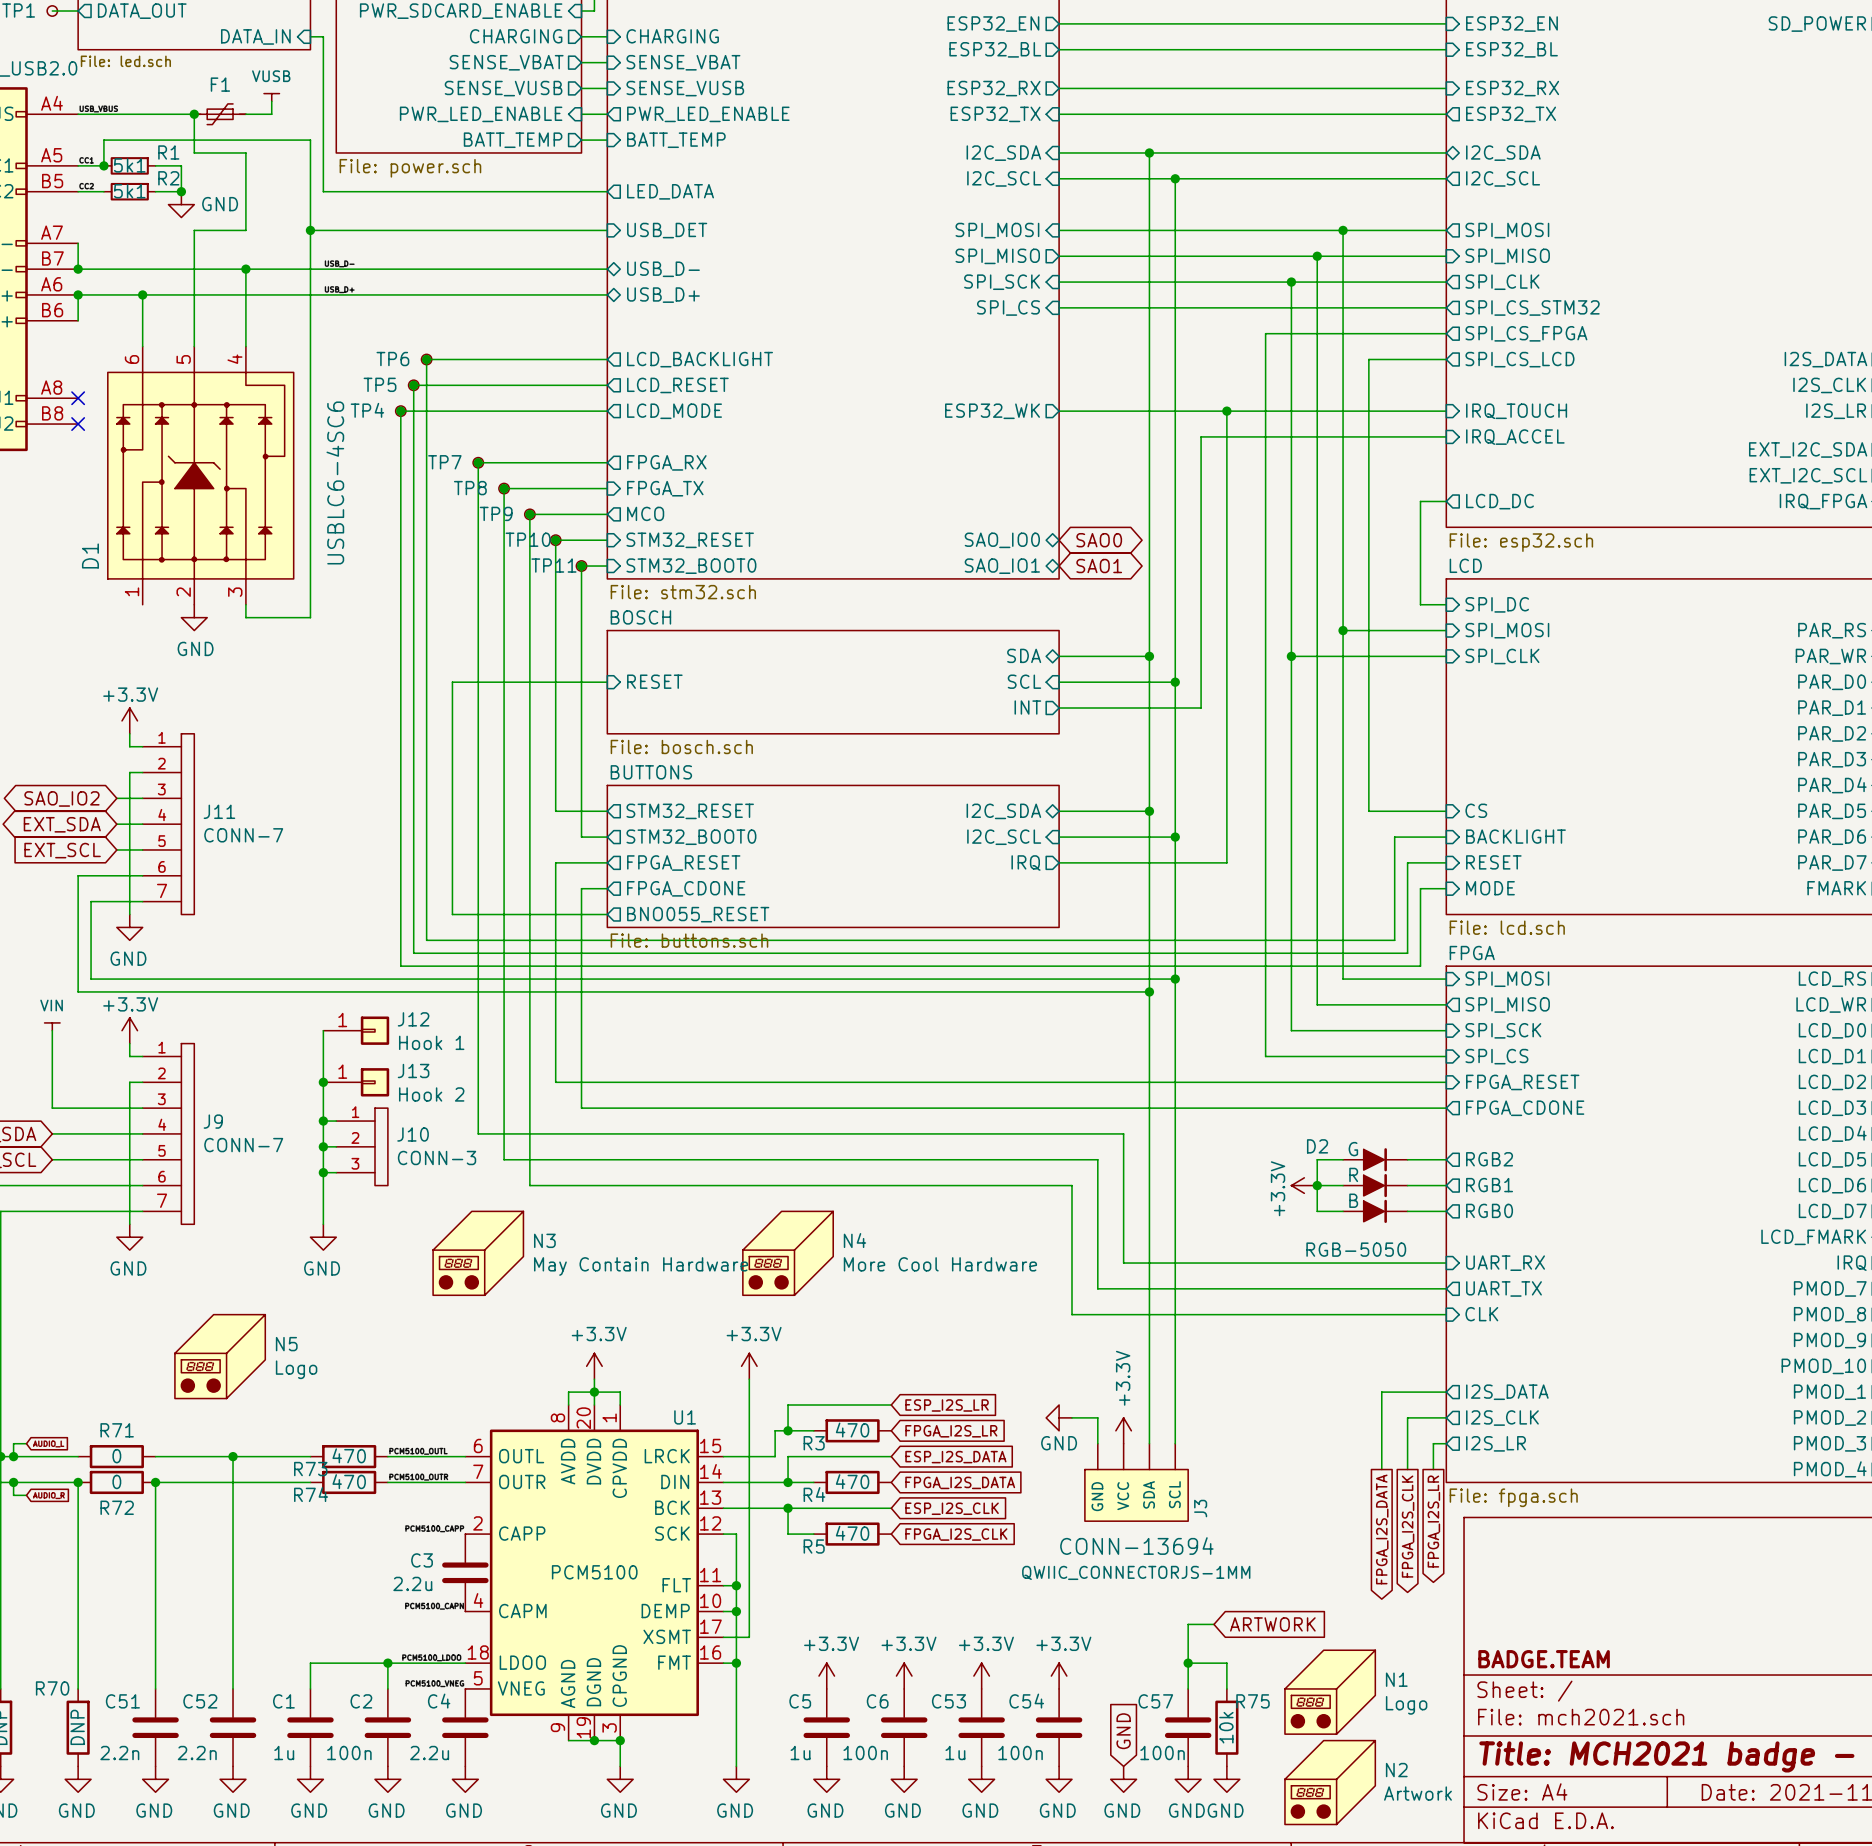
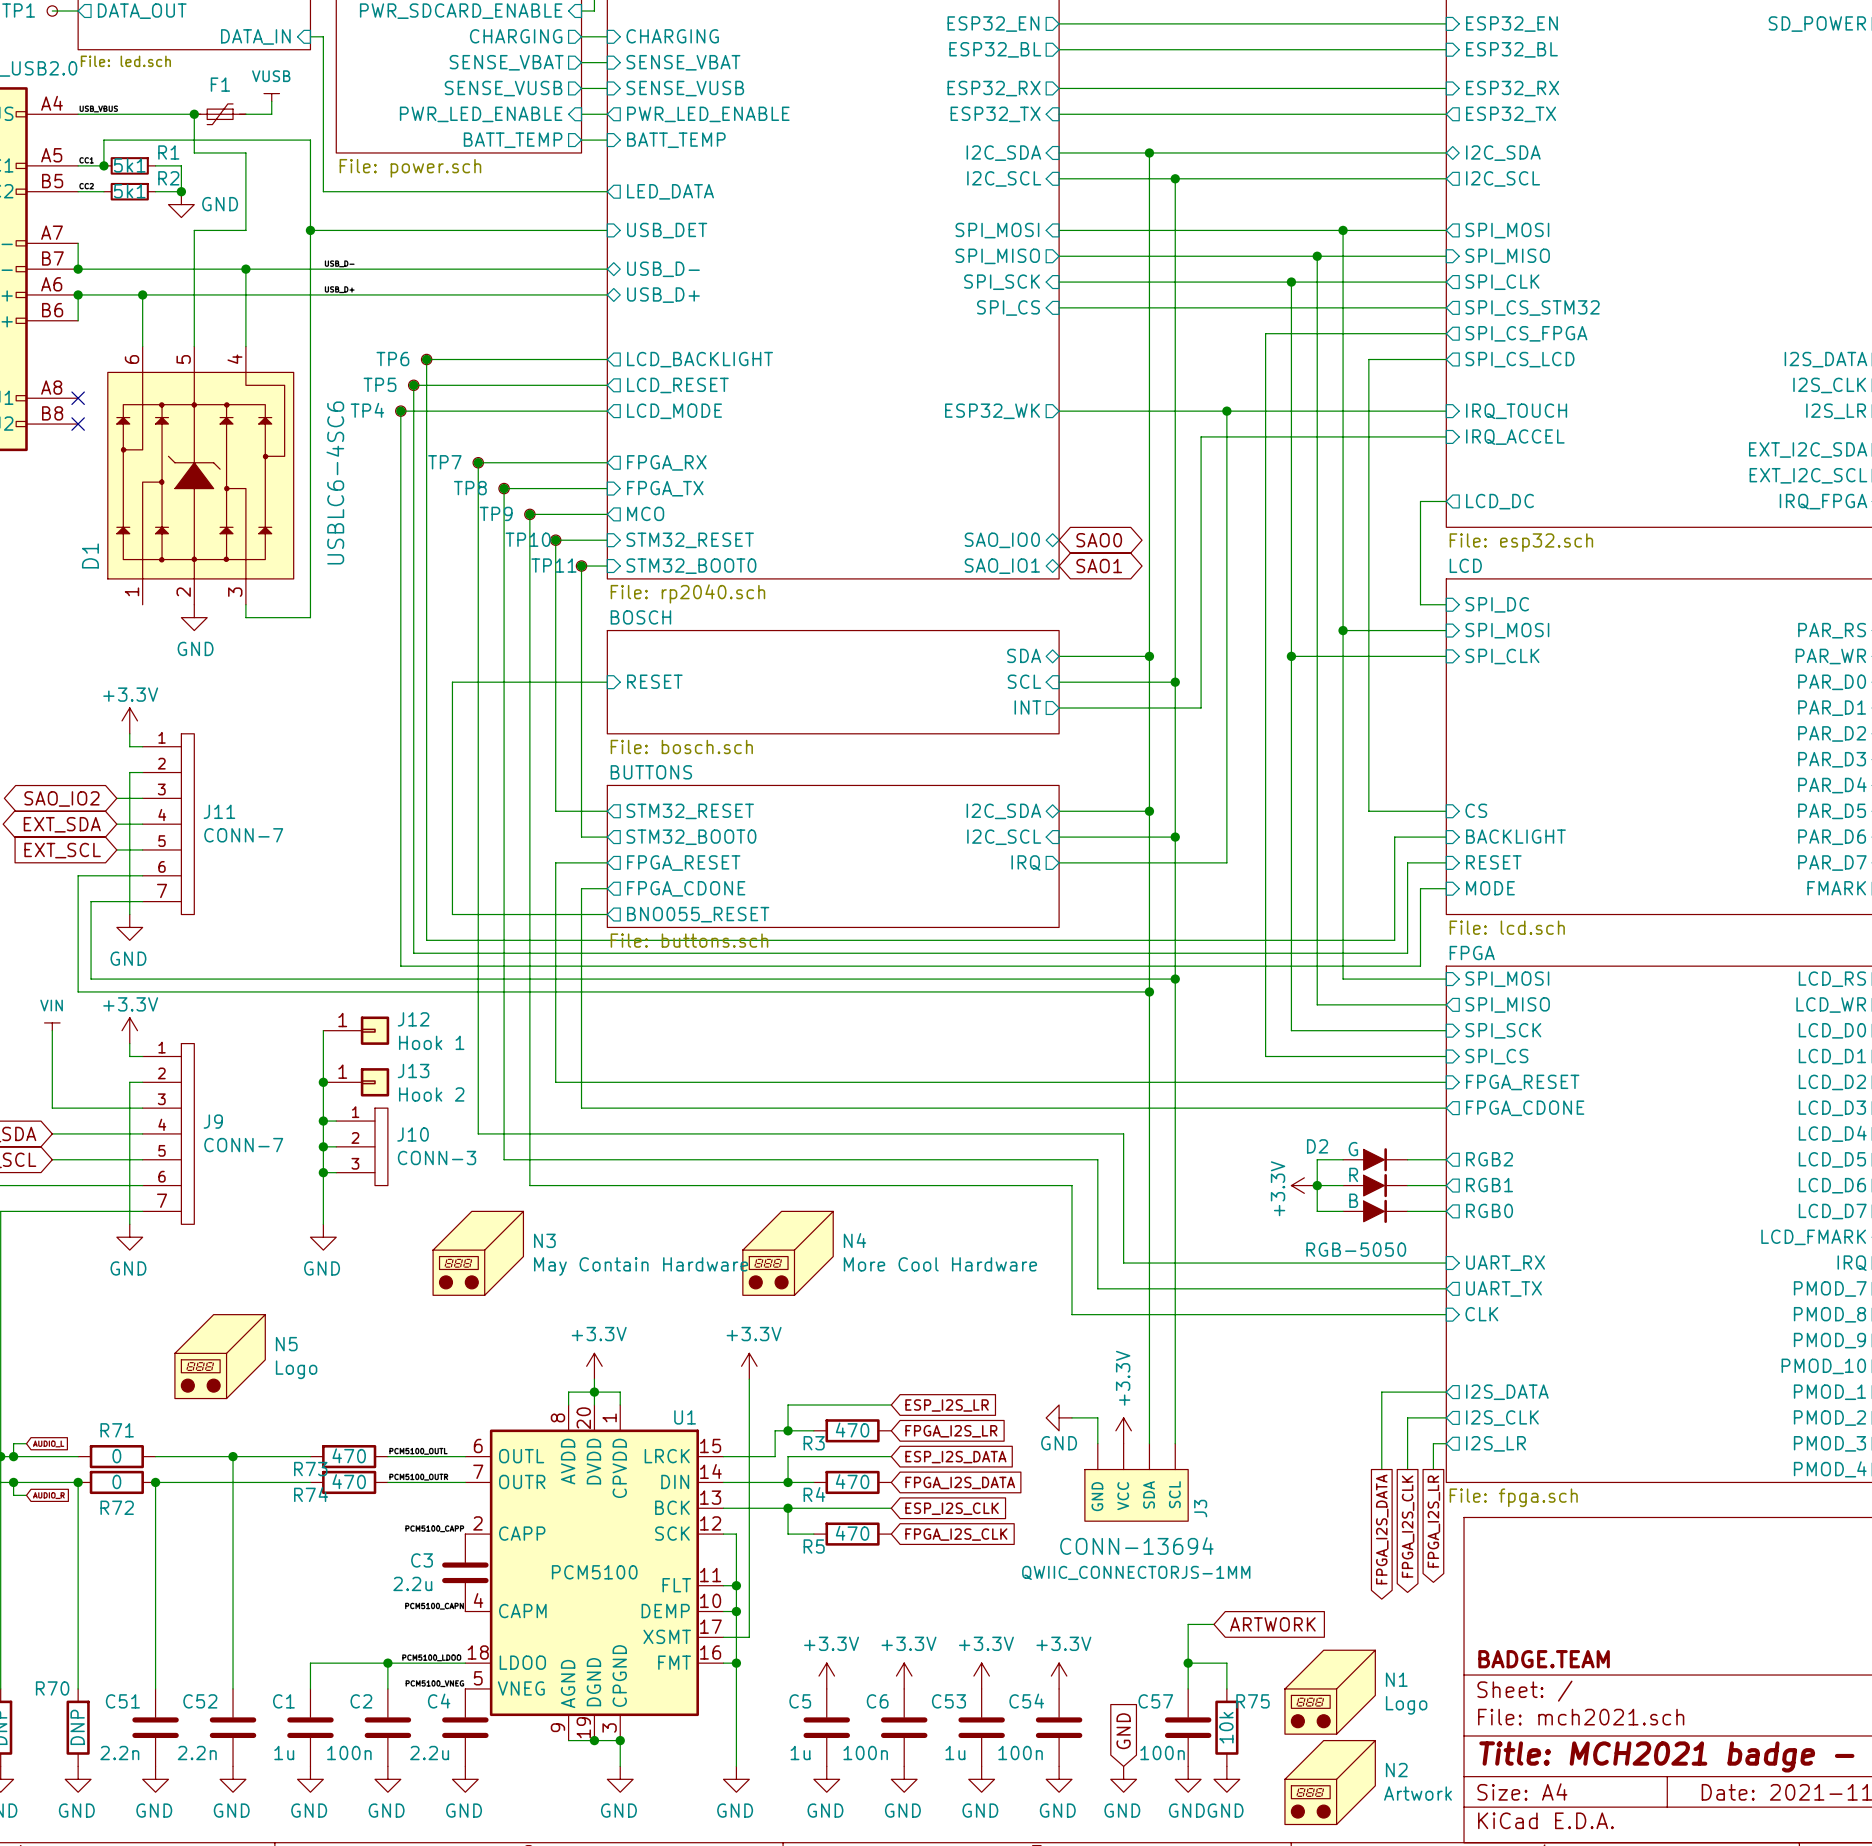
sheet value: File: stm32.sch (683, 592) -> File: rp2040.sch (687, 593)

